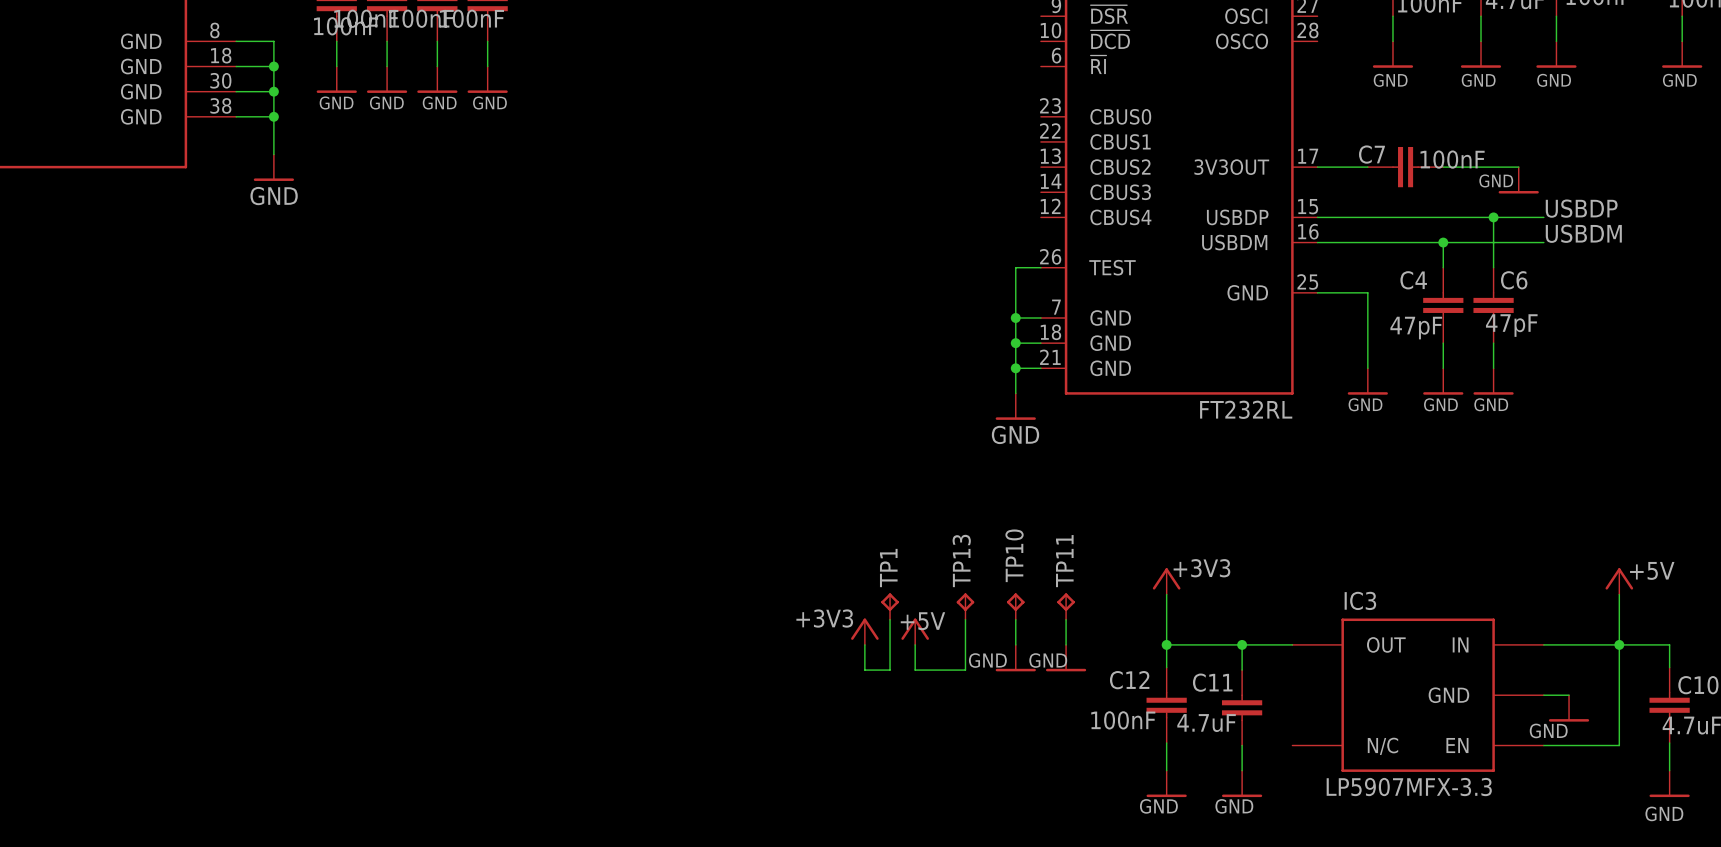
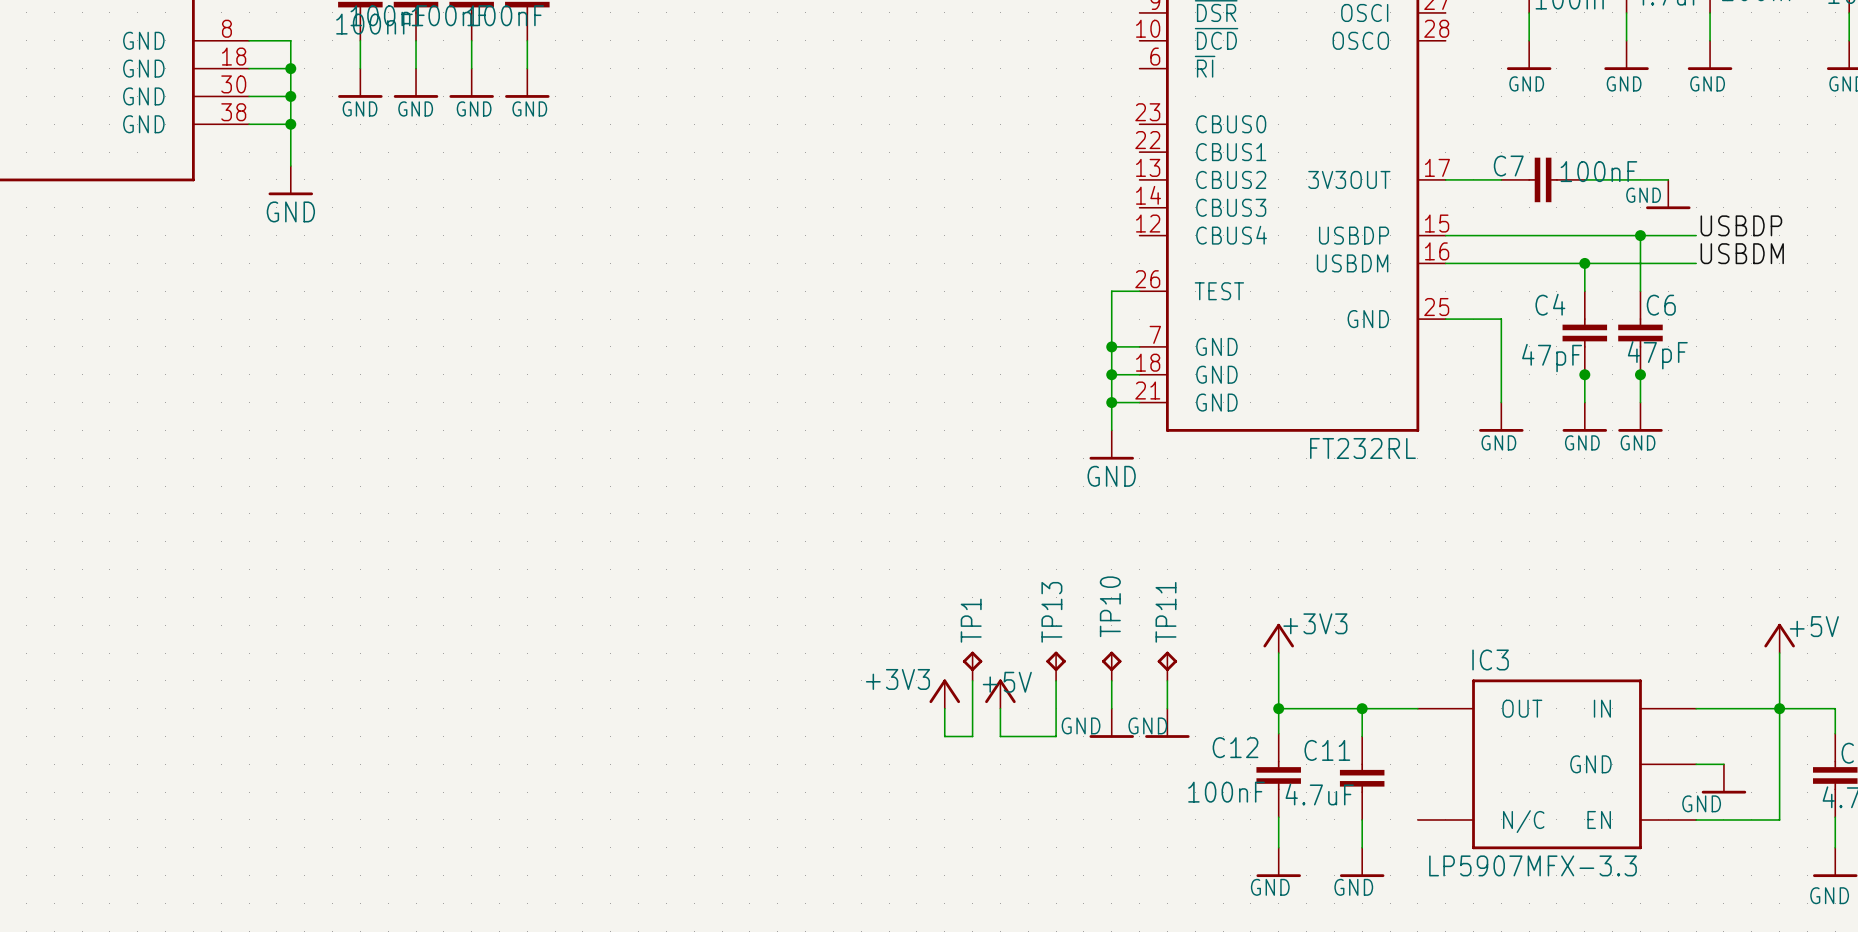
junction: none -> (1584, 374)
junction: none -> (1640, 374)

